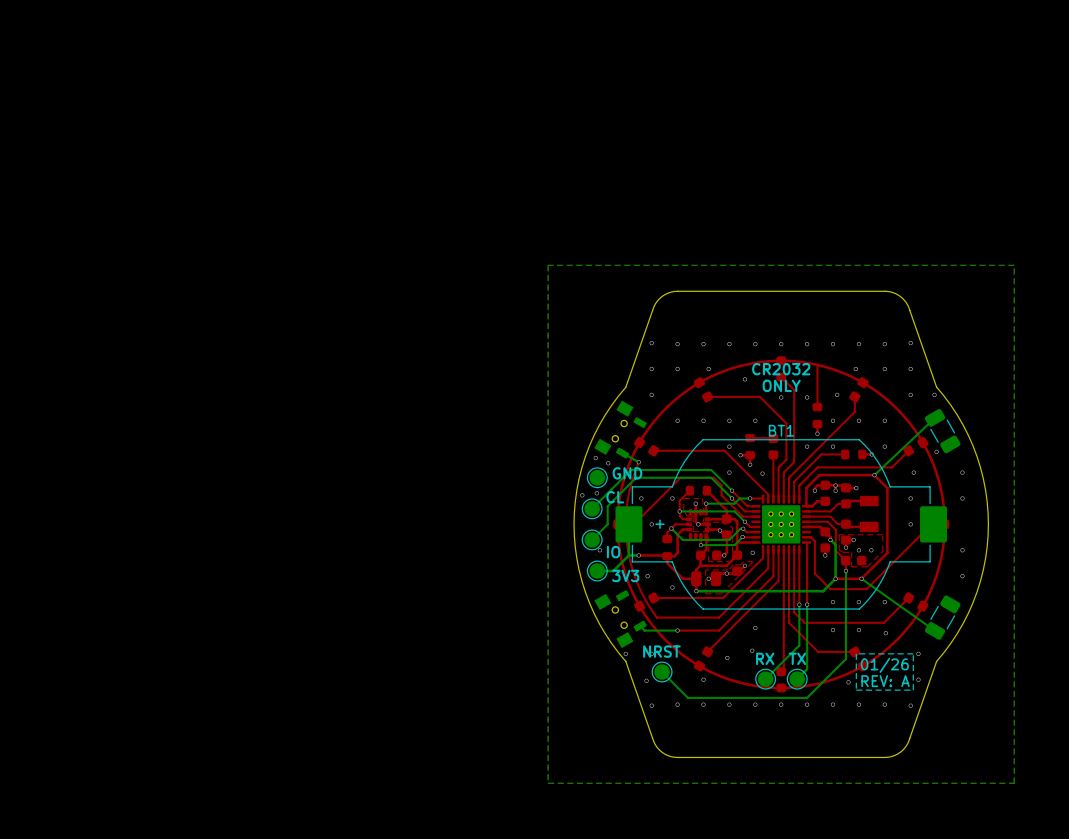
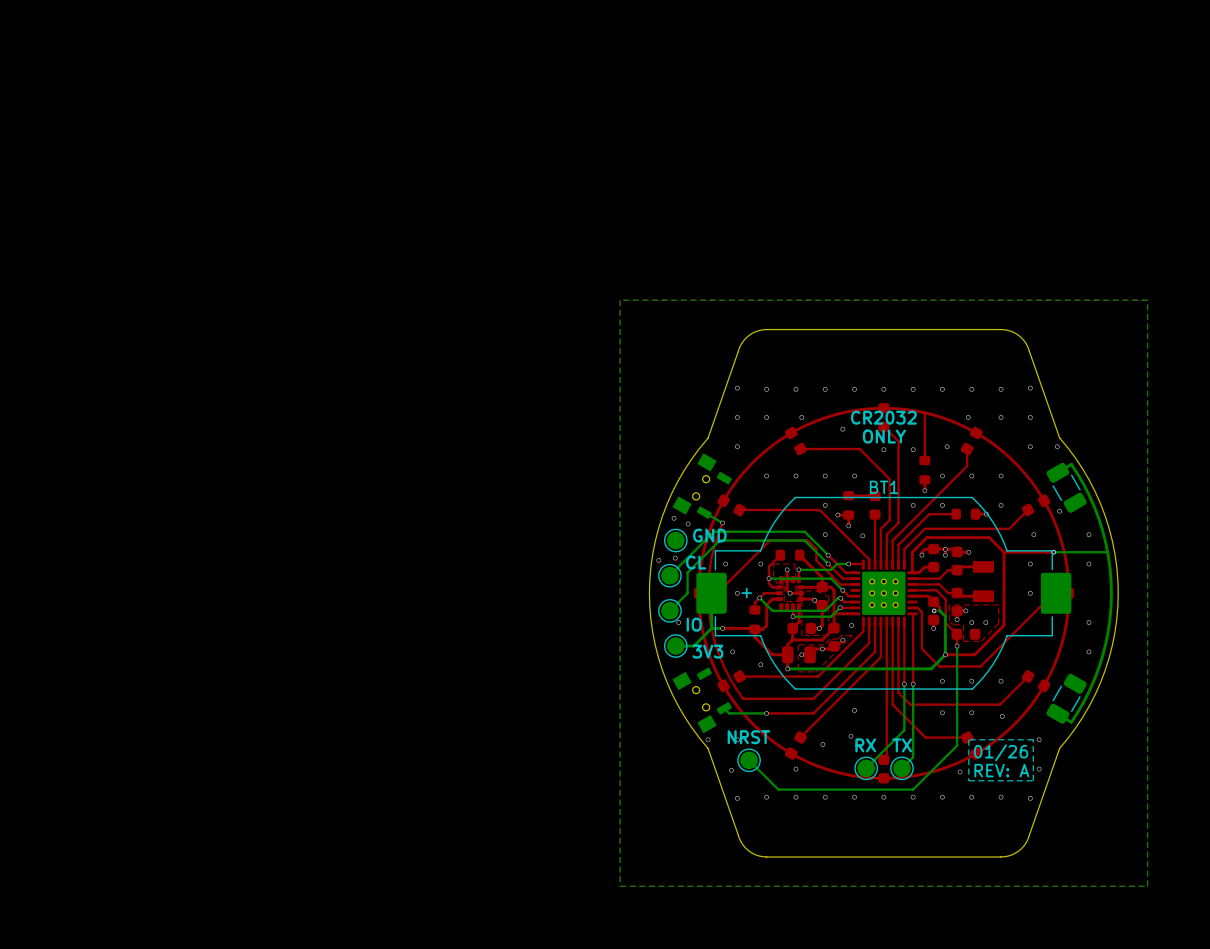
bottom track: (935, 417) (874, 475) -> none
bottom track: none -> (1056, 473) (1071, 464) (1089, 496) (1105, 543) (1111, 593) (1105, 642) (1089, 689) (1071, 722) (1056, 713)
via: (874, 475) -> none
top track: none -> (1053, 552) (1003, 552)
via: none -> (1053, 552)
bottom track: none -> (1107, 552) (1053, 552)
via: none -> (934, 610)
via: (830, 539) -> none
bottom track: (861, 578) (935, 630) -> none
via: (861, 578) -> none

